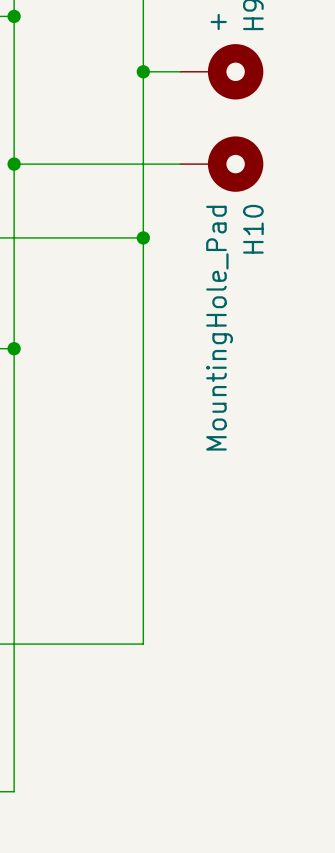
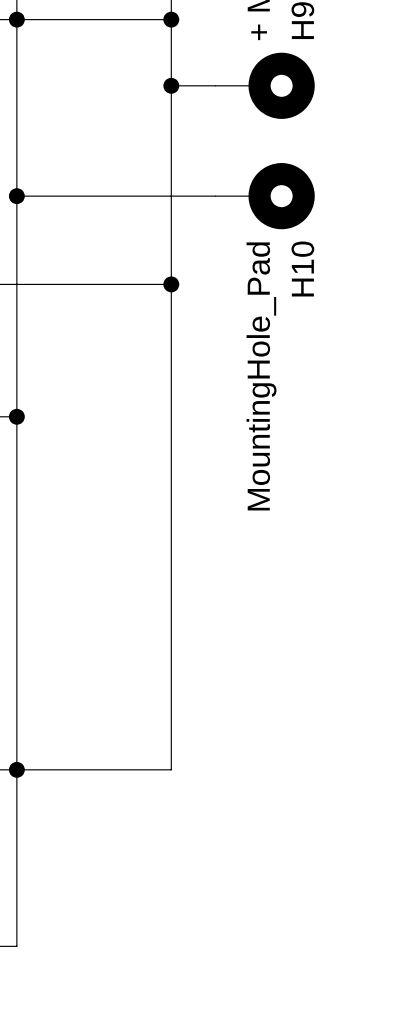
wire: none -> (16, 19) (171, 19)
junction: none -> (171, 19)
junction: none -> (16, 769)

